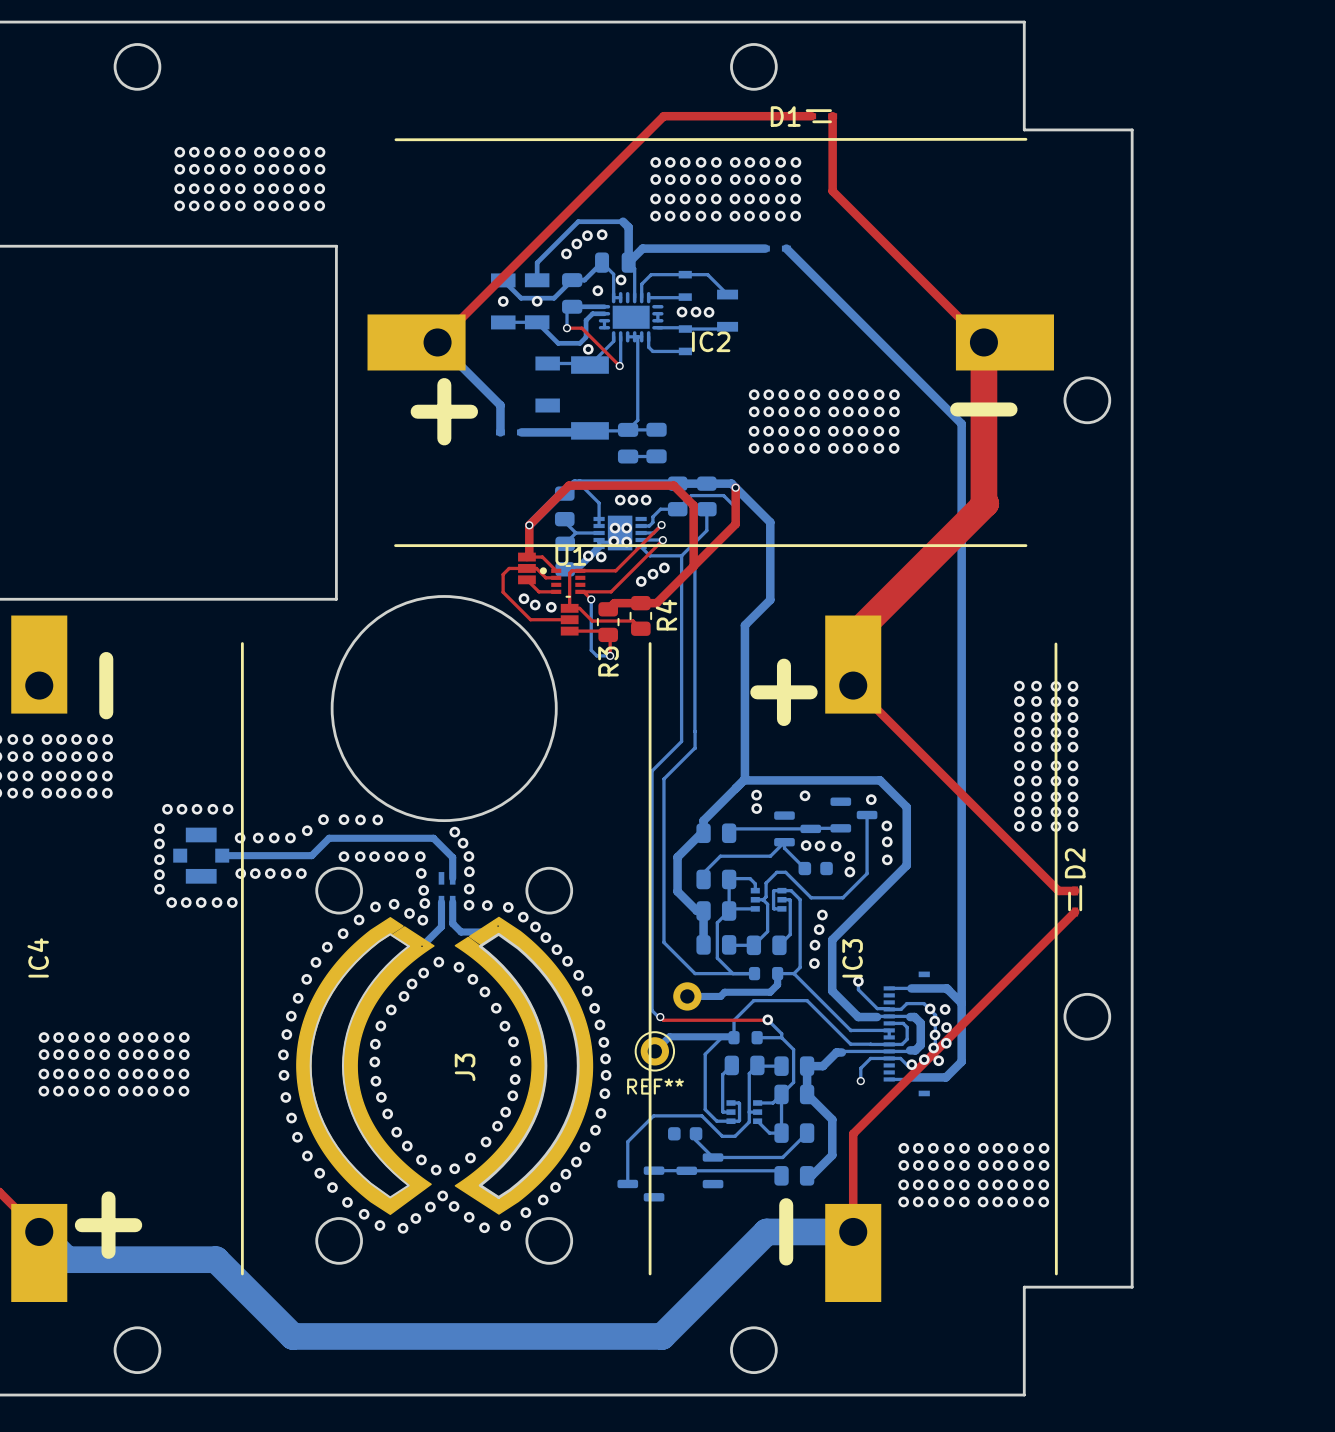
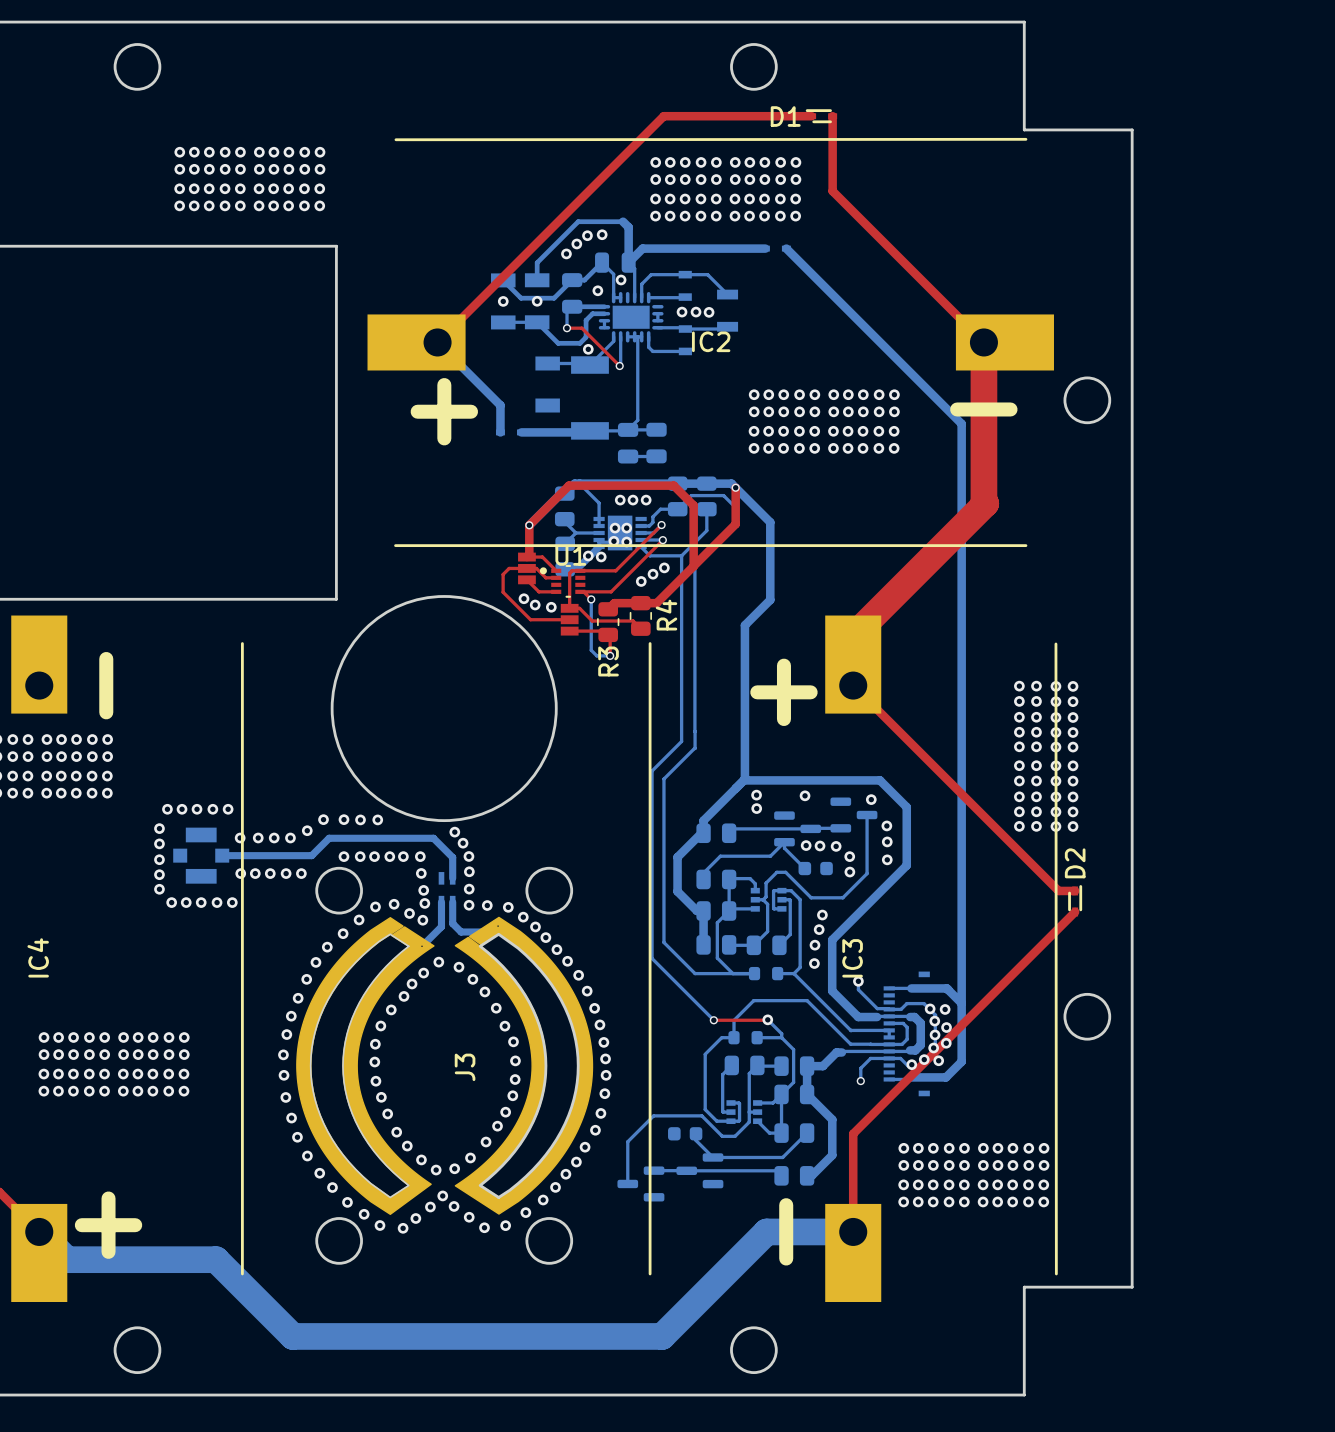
bottom track: (652, 958) (652, 1010) (660, 1017) -> (652, 958) (713, 1020)
bottom track: (777, 973) (777, 984) (770, 992) (724, 992) (720, 996) (687, 996) -> none
part: (687, 996) -> none
top track: (660, 1017) (663, 1020) (713, 1020) -> none
via position: (660, 1017) -> (713, 1020)
bottom track: (734, 1037) (669, 1036) (654, 1051) -> none
REF**: (654, 1051) -> none

